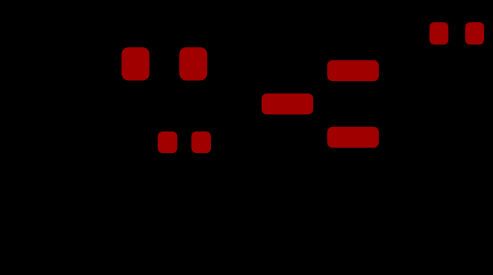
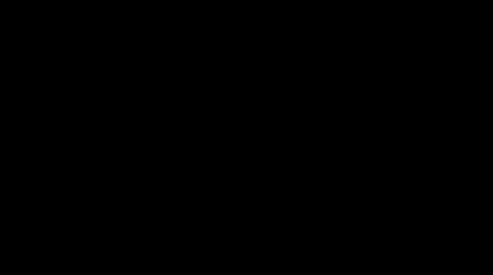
part: (456, 33) -> none
part: (164, 63) -> none
part: (320, 103) -> none
part: (184, 142) -> none

